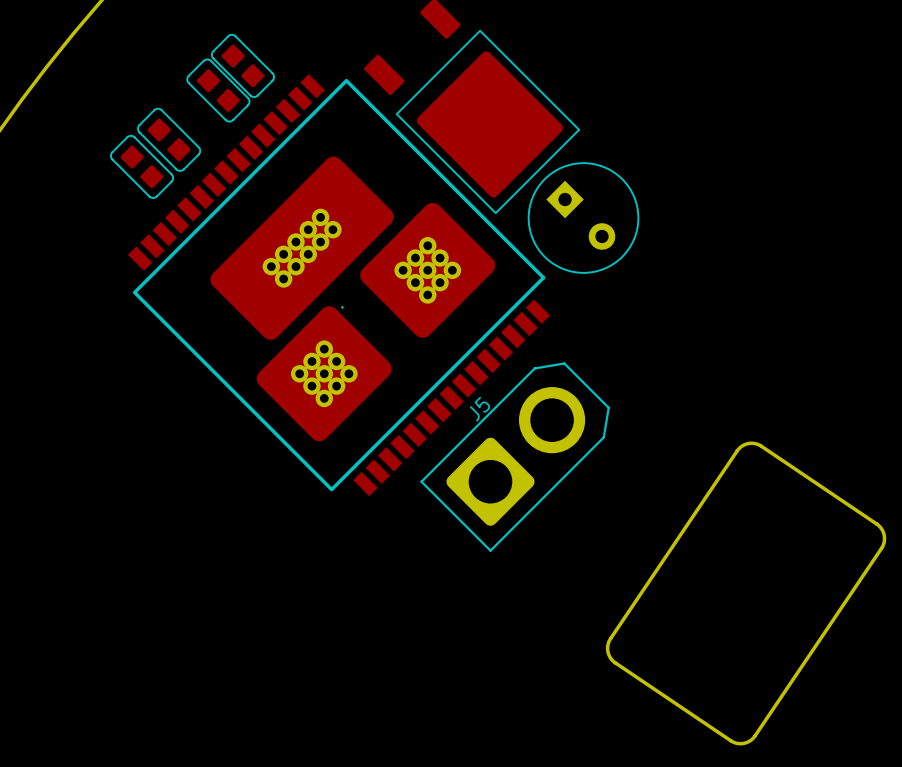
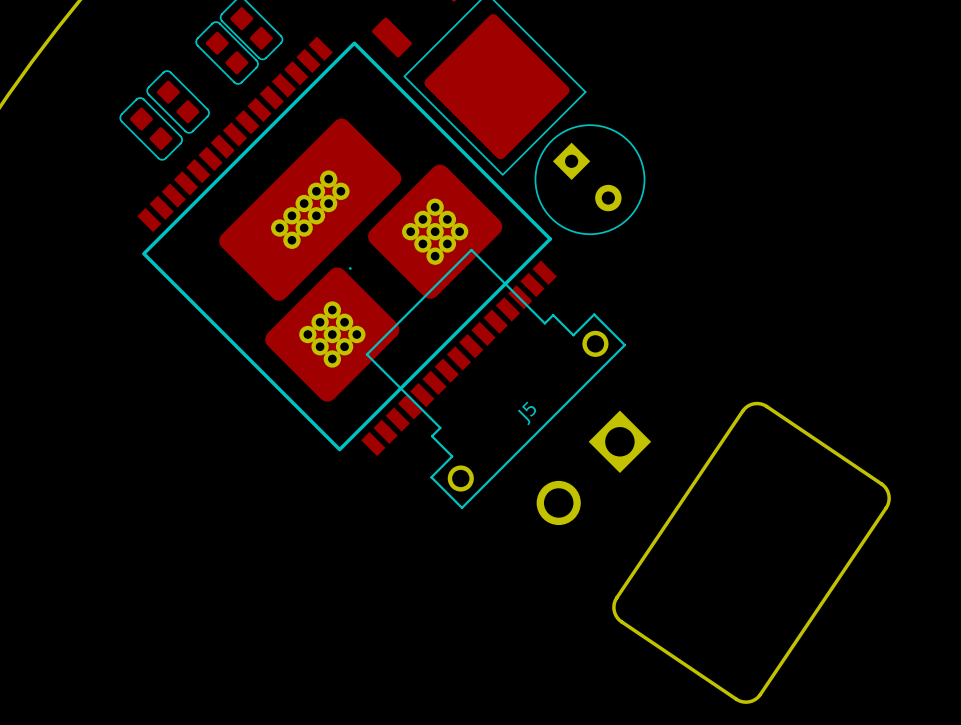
J5 footprint: [420, 362, 610, 552] -> [365, 248, 652, 526]
J5 name position: J5 (479, 409) -> J5 (527, 413)

